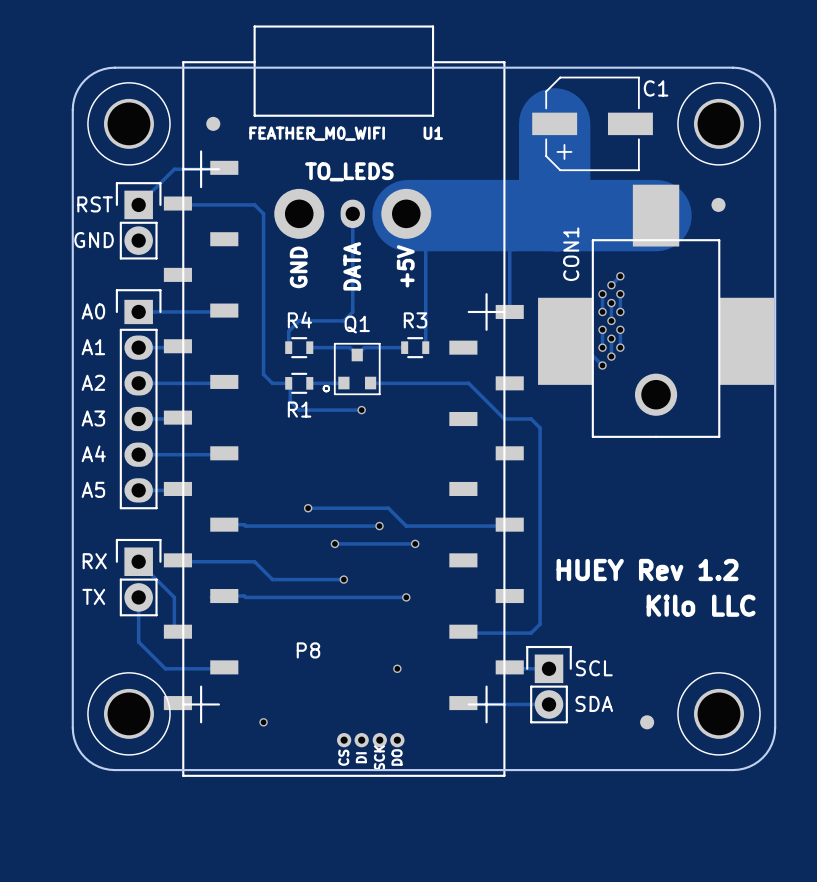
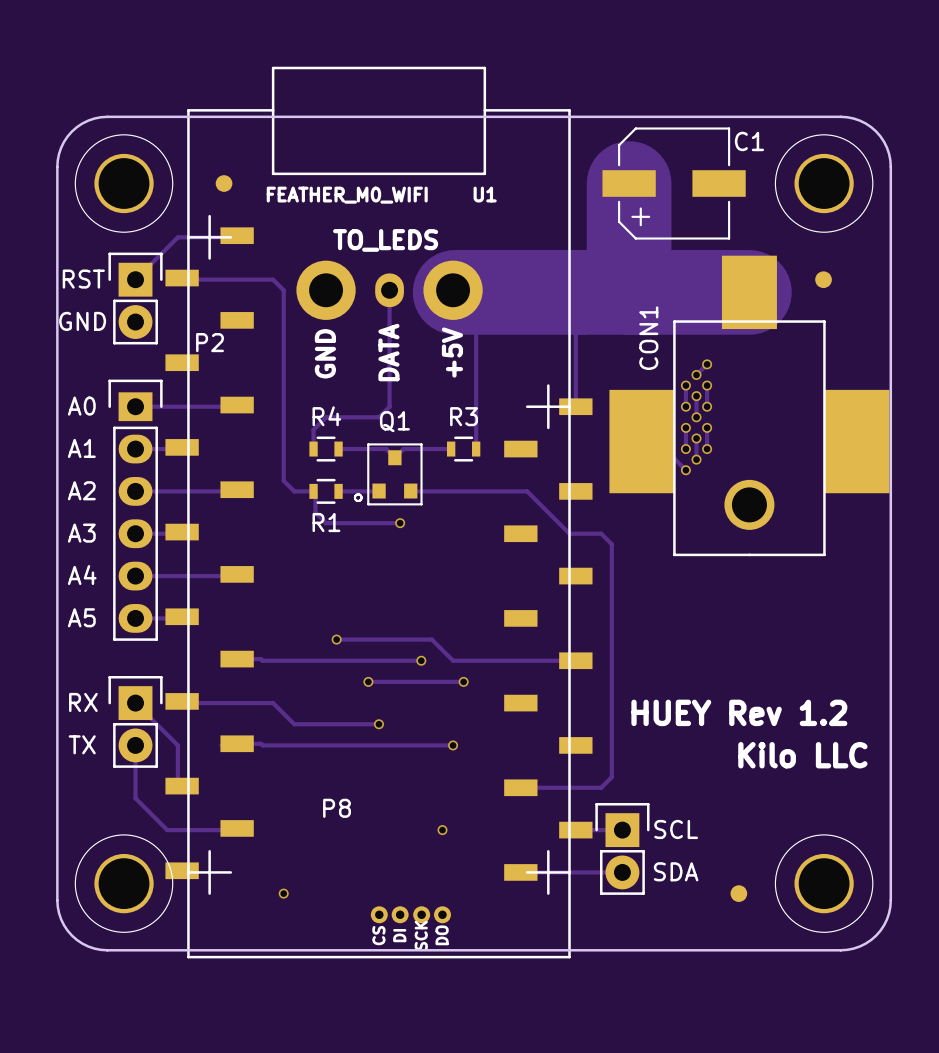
P2 name: none -> P2 (210, 342)
part: none -> (548, 639)
part: (486, 578) -> none

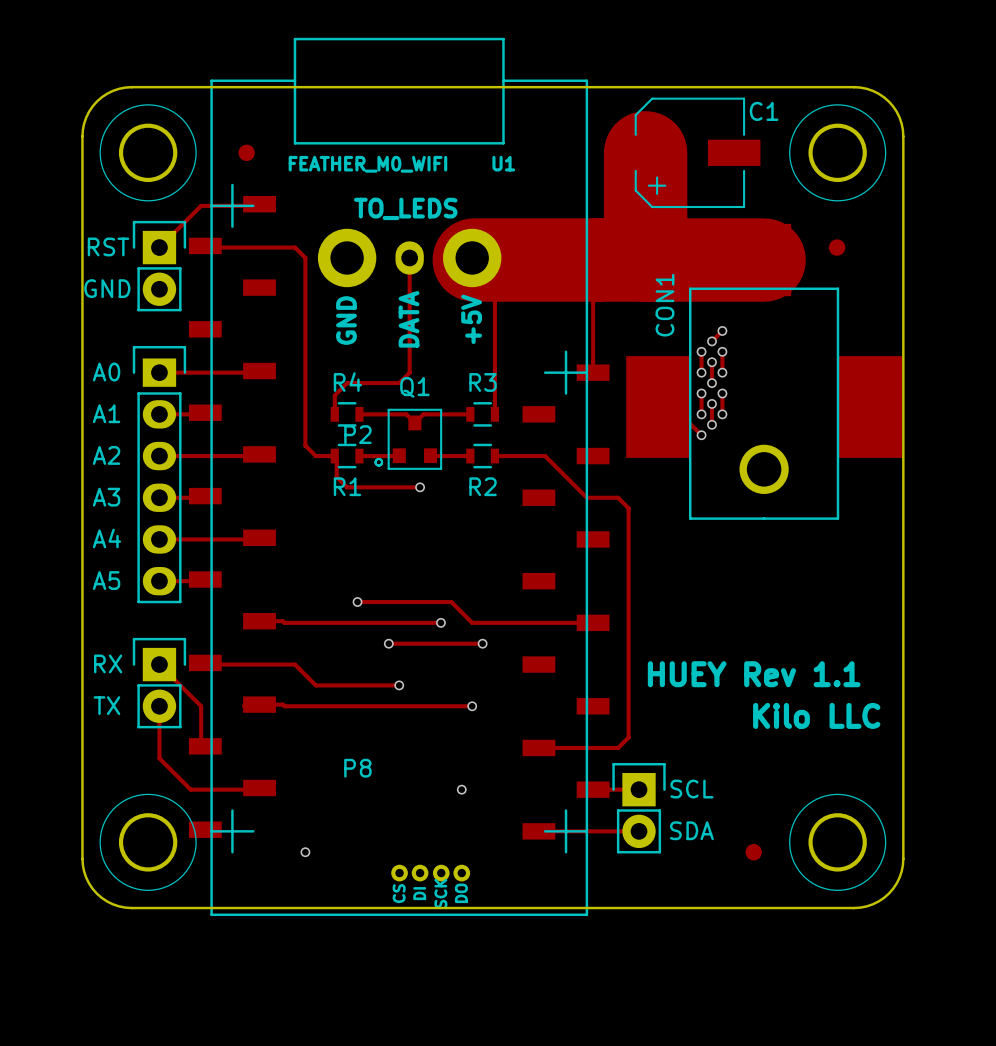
P2 name position: P2 (210, 342) -> P2 (357, 434)
track: (451, 491) (476, 491) -> none
R2: none -> (482, 456)
text: HUEY Rev 1.2 (739, 712) -> HUEY Rev 1.1 (754, 674)

